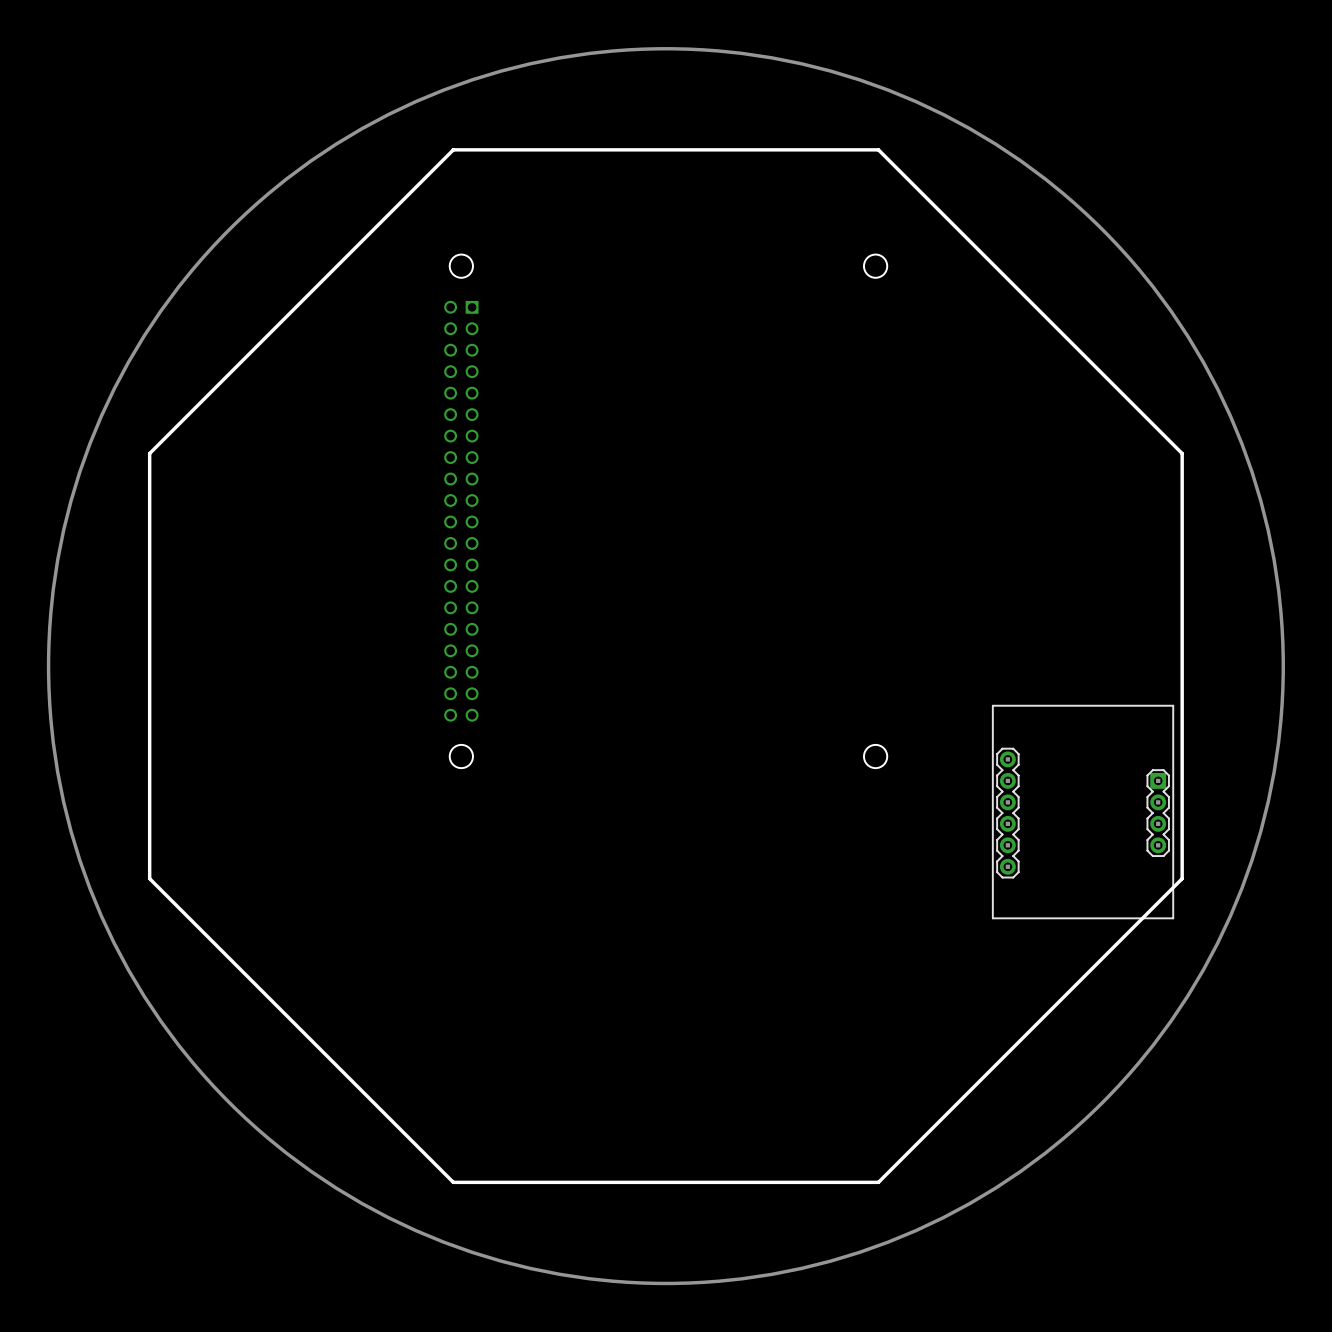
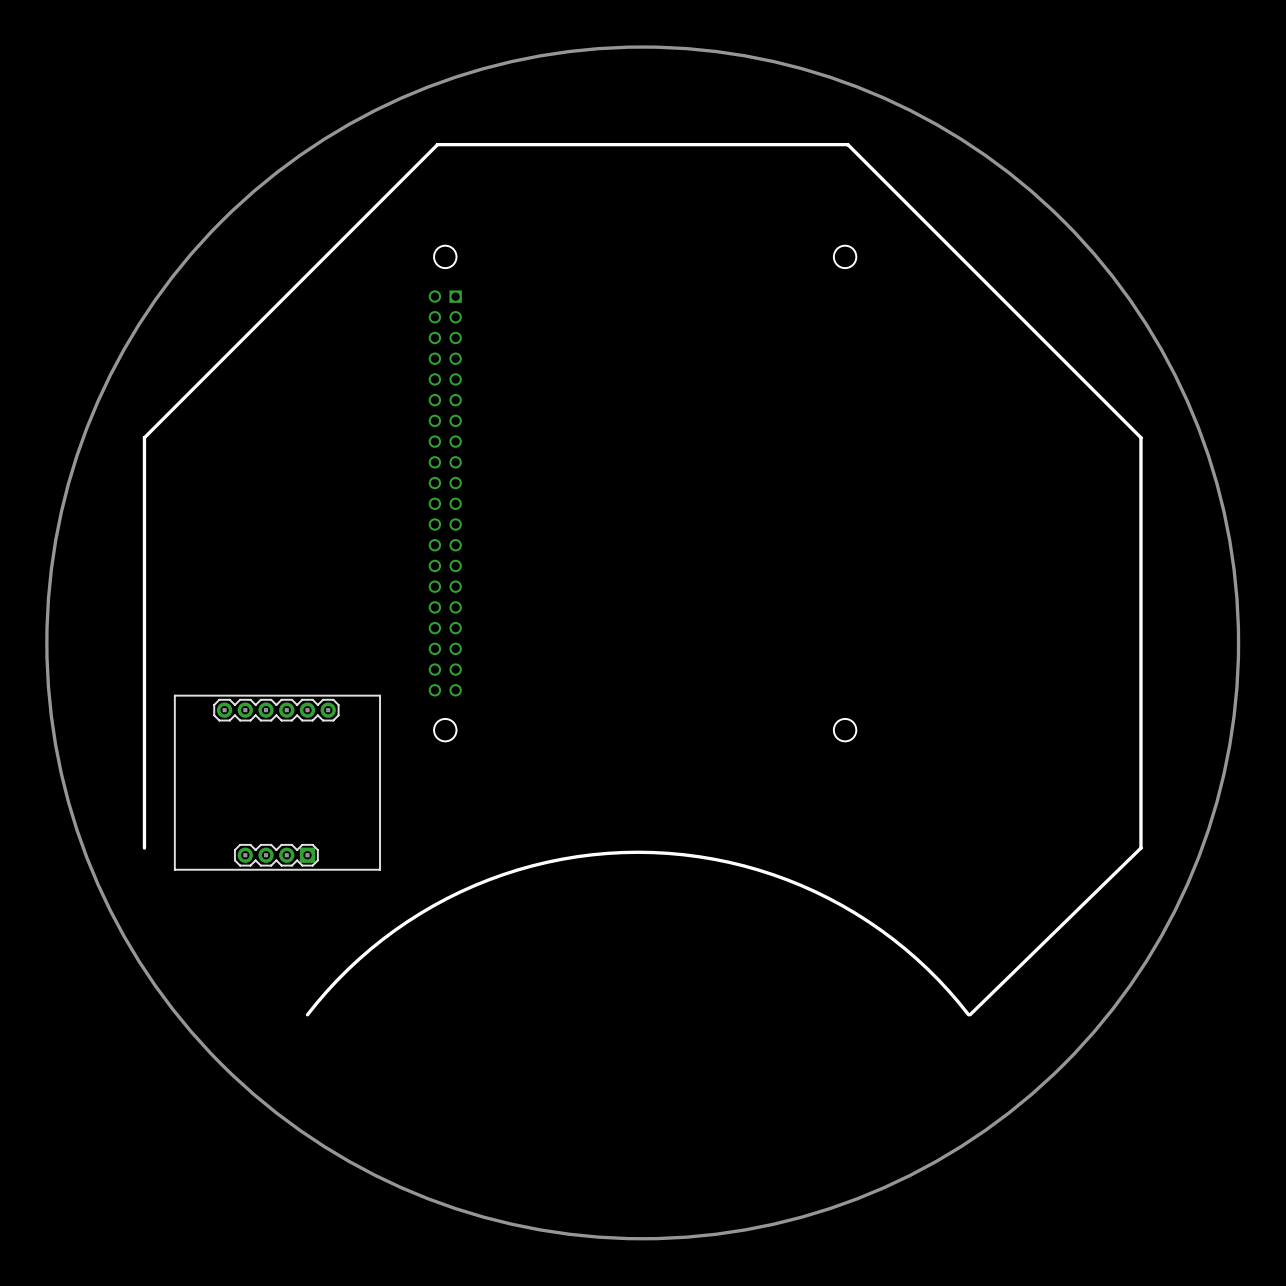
part: none -> (277, 782)
part: (1083, 812) -> none
board edge: (149, 878) (453, 1182) (878, 1182) (1182, 878) -> (970, 1014) (1140, 848)
board edge: none -> (307, 1014) (337, 980) (370, 948) (407, 921) (447, 898) (503, 874) (547, 862) (592, 854) (638, 852) (683, 854) (728, 862) (772, 874) (829, 898) (868, 921) (905, 948) (938, 980) (968, 1014)

